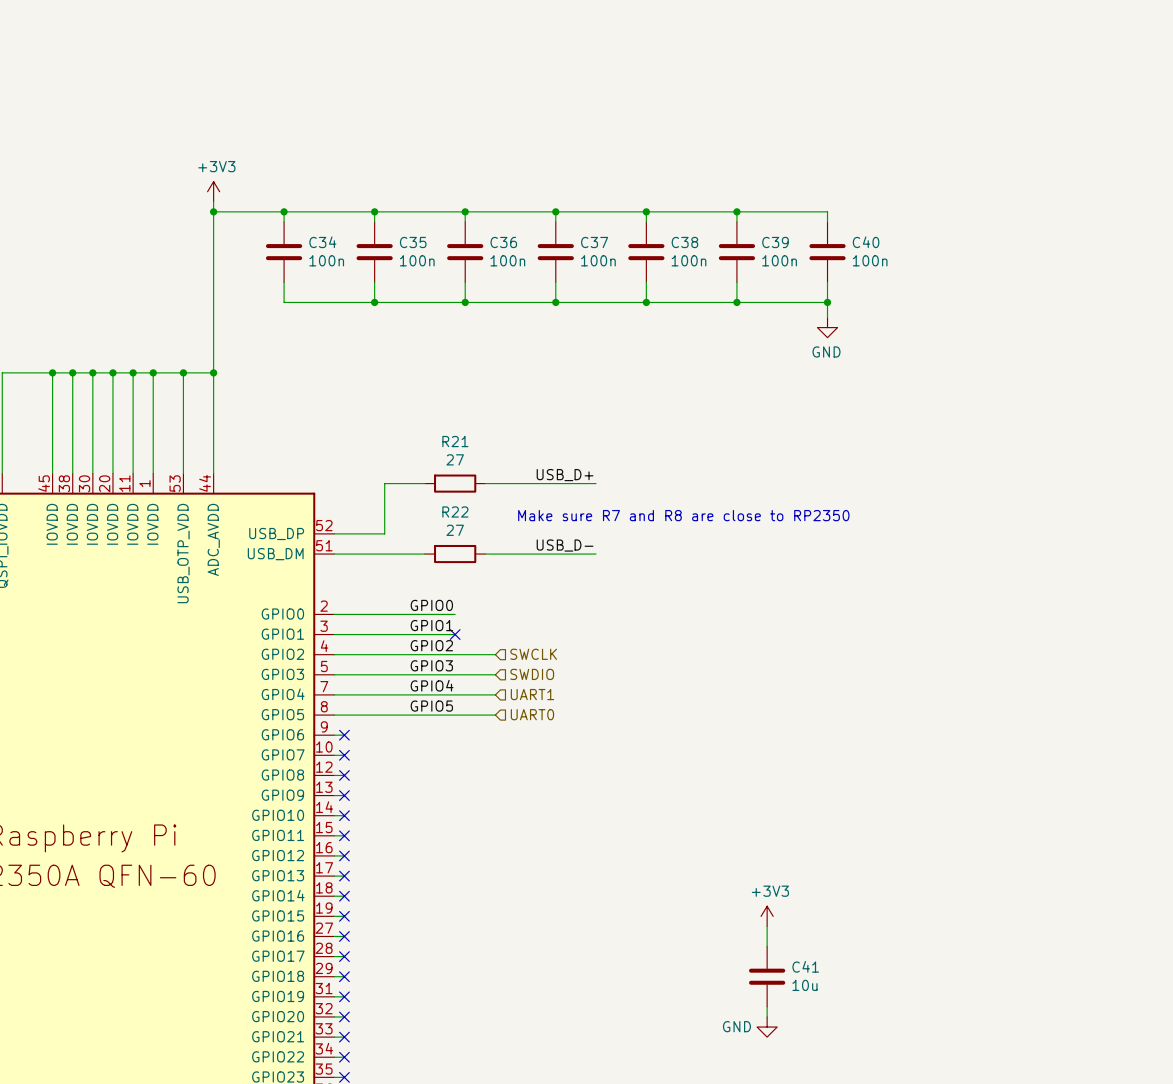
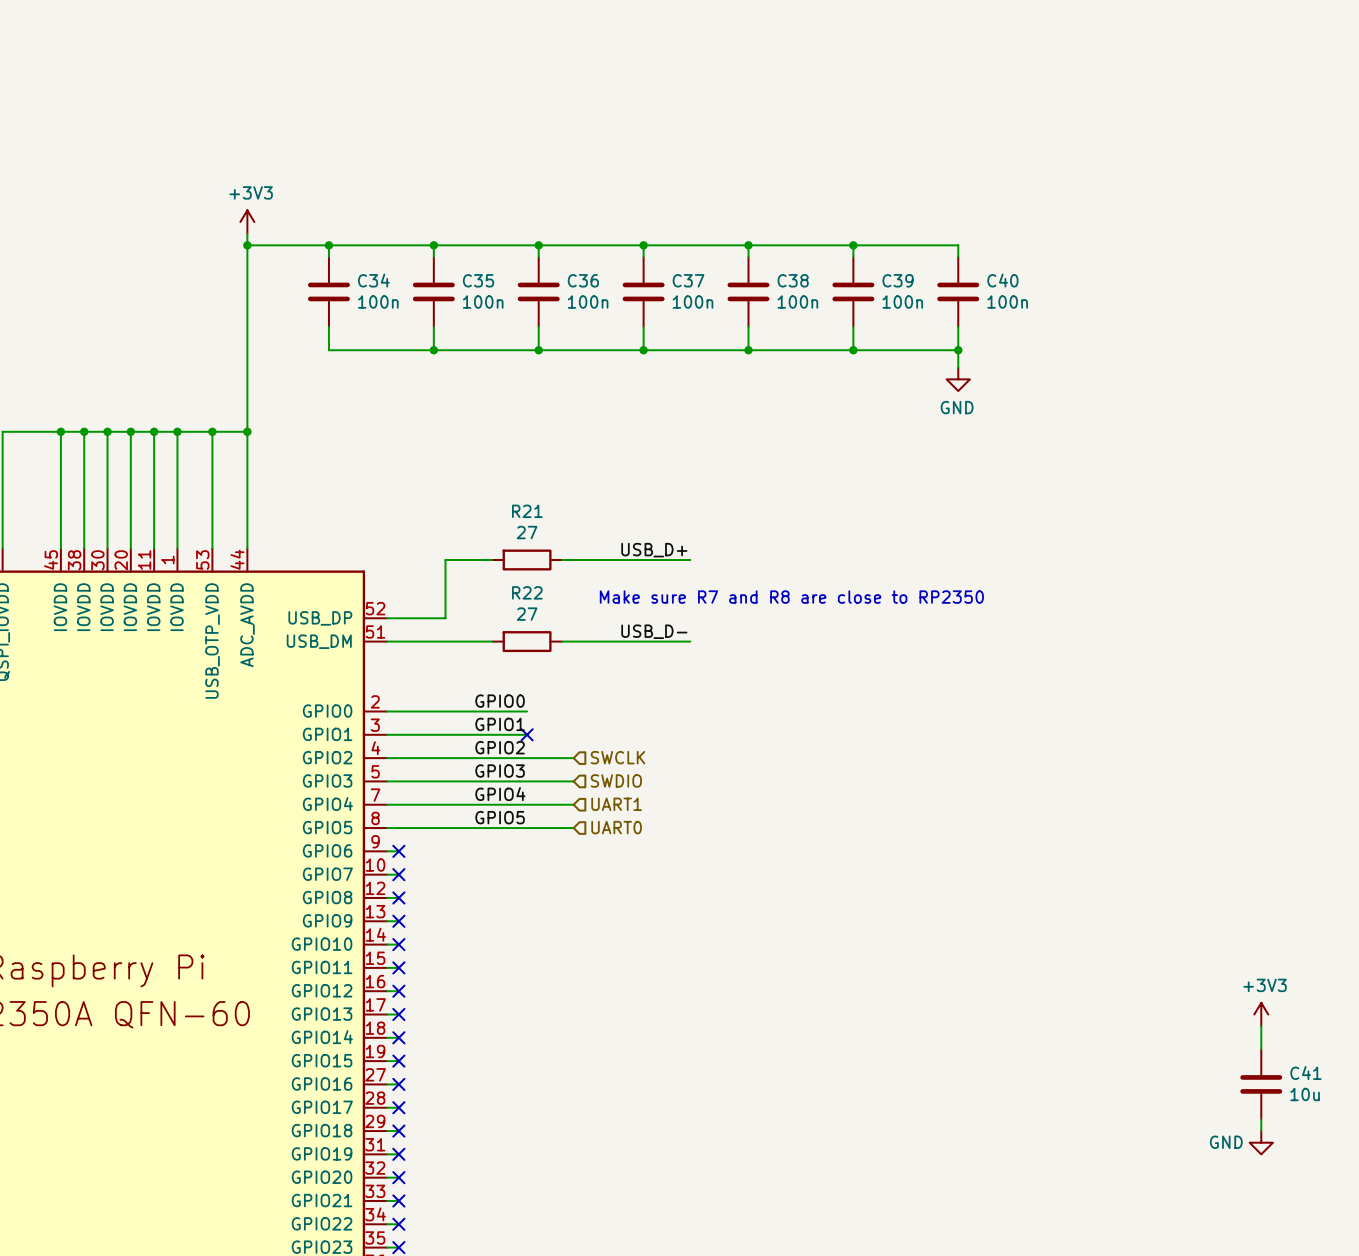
power symbol: none -> +3V3 (1261, 1014)
wire: none -> (1261, 1026) (1261, 1049)
power symbol: +3V3 (767, 916) -> none
wire: (767, 926) (767, 946) -> none
wire: none -> (1261, 1119) (1261, 1131)
C41 position: (767, 976) -> (1261, 1084)
power symbol: none -> GND (1261, 1142)
wire: (767, 1006) (767, 1016) -> none
power symbol: GND (767, 1027) -> none

